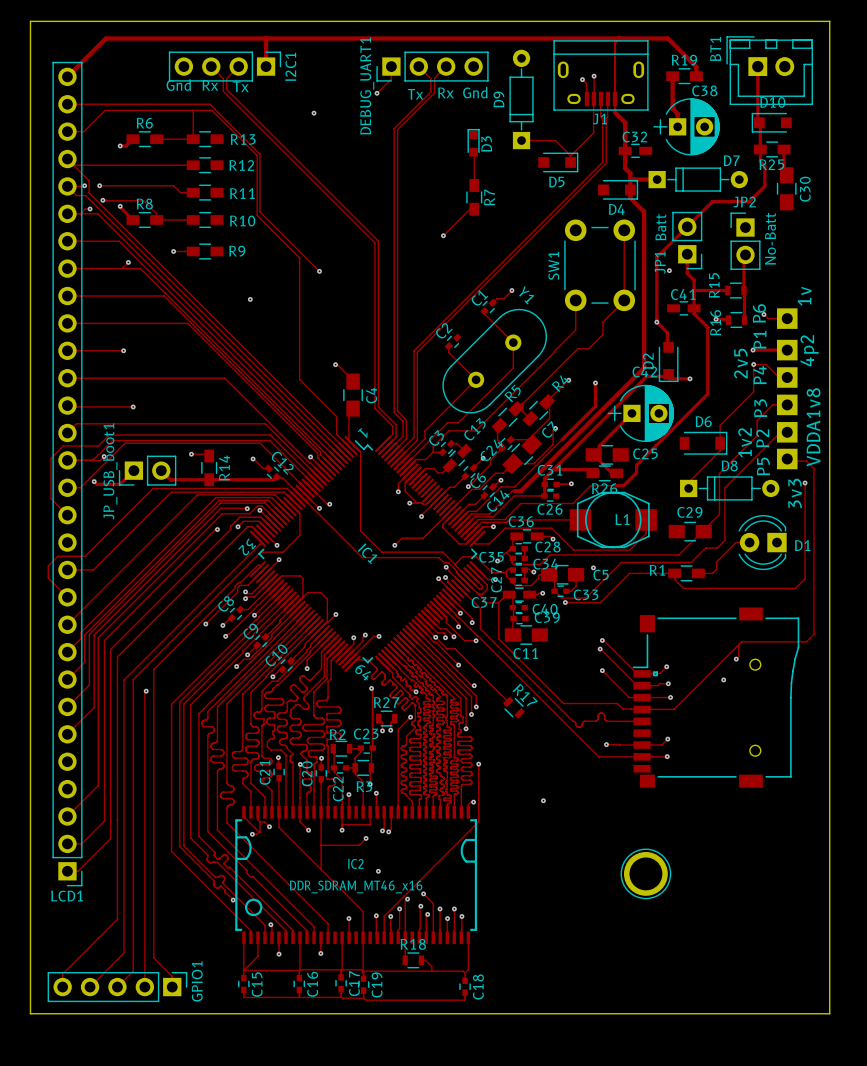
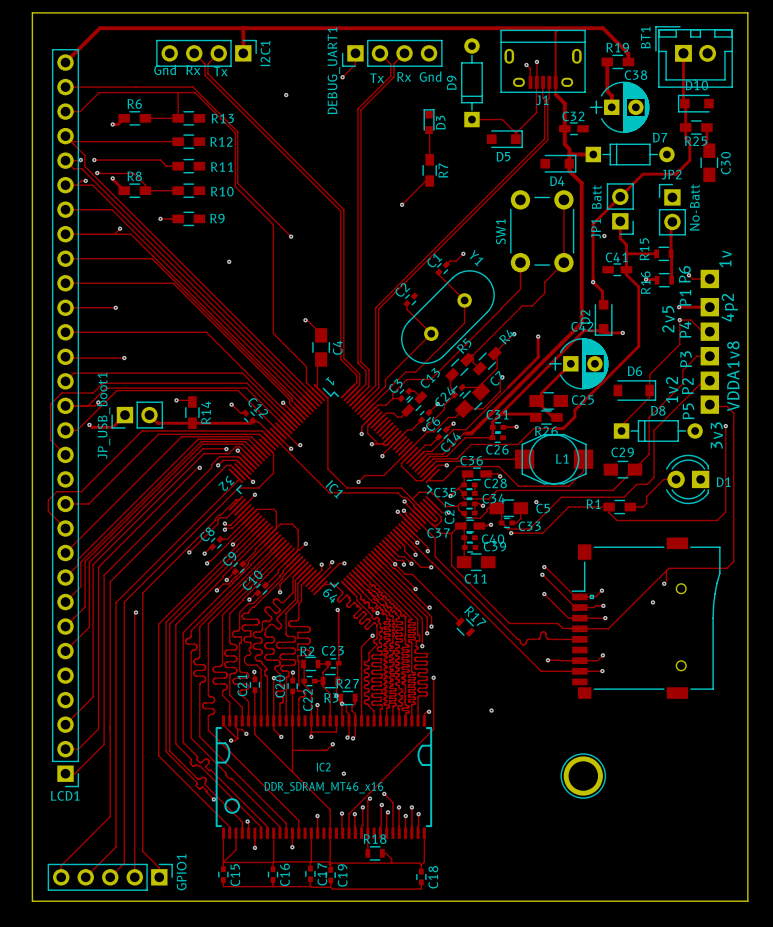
track: (378, 718) (382, 722) (382, 730) -> none
R27 position: (386, 718) -> (347, 698)
track: (394, 718) (390, 722) (390, 730) -> none
via: (382, 730) -> none
via: (390, 730) -> none
track: none -> (340, 698) (346, 705) (349, 720)
track: none -> (355, 698) (352, 710) (355, 714) (355, 720)

